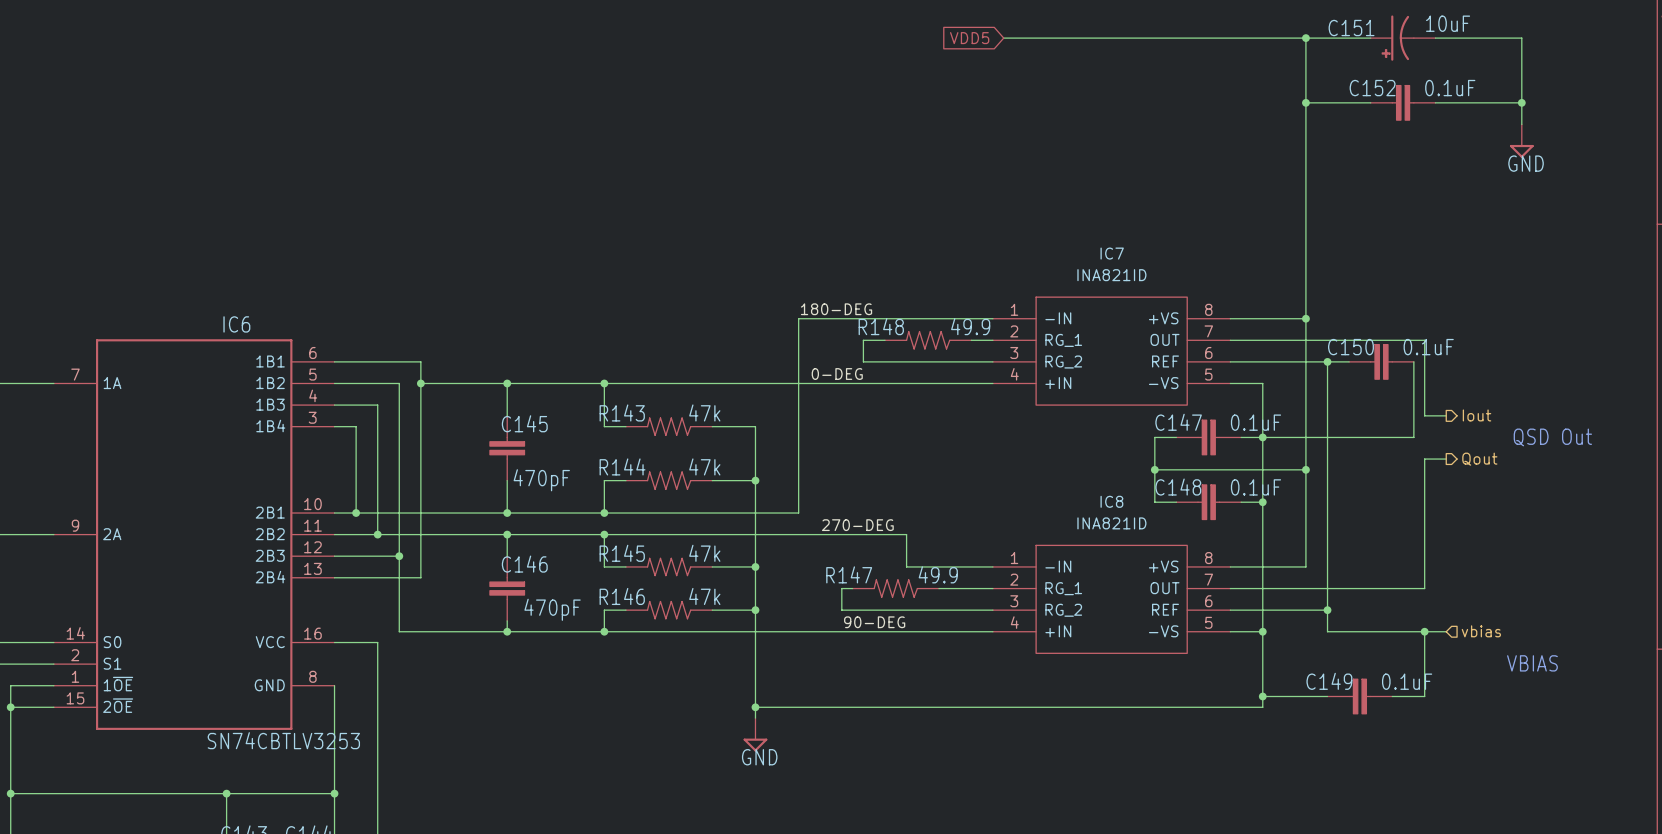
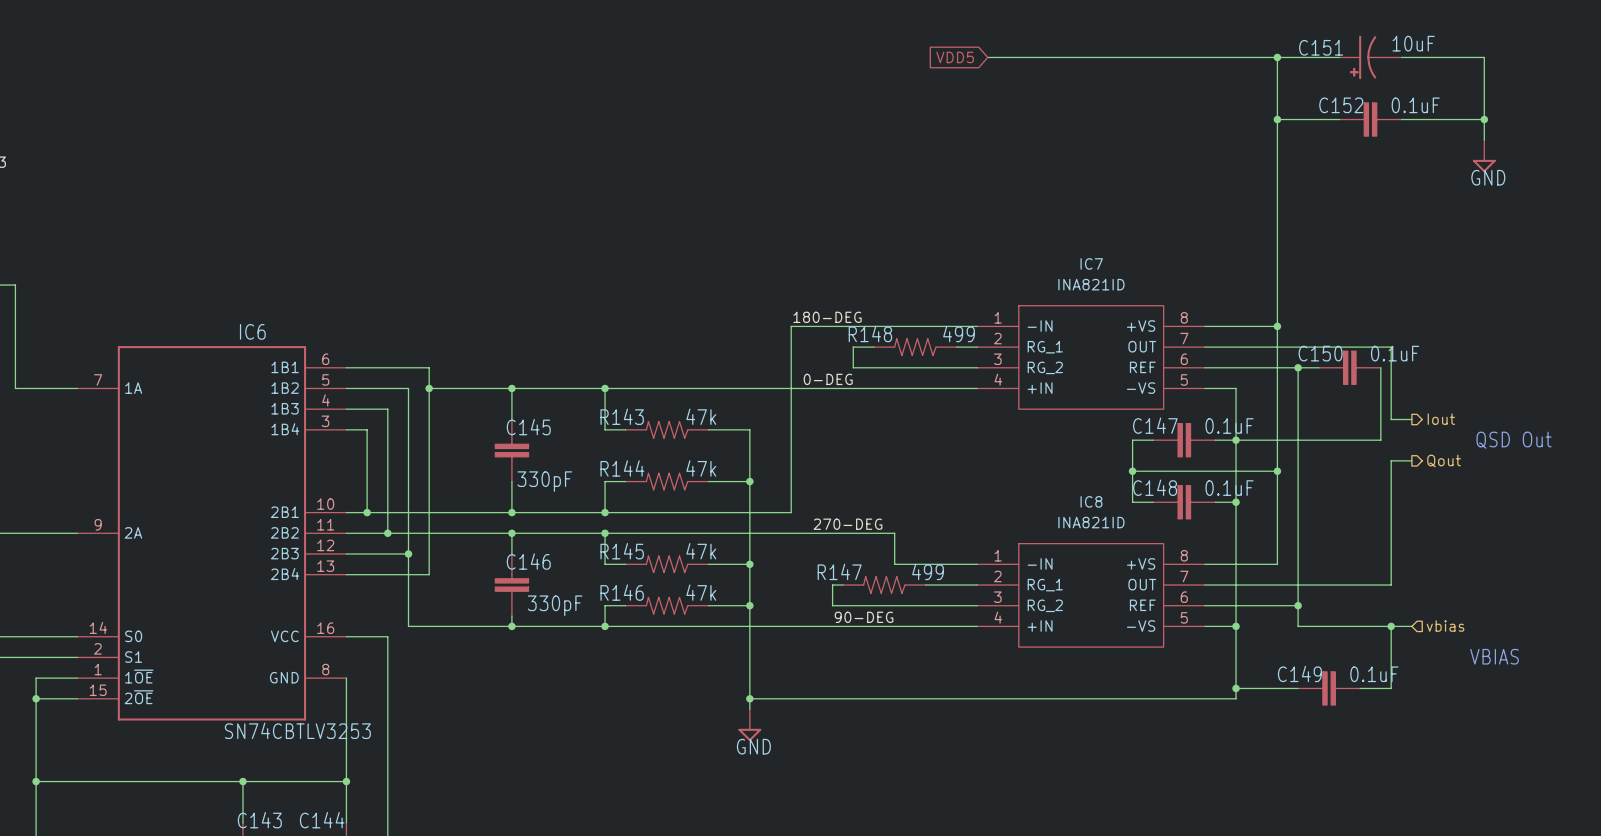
R148 value: 49.9 (970, 326) -> 499 (959, 333)
C145 value: 470pF (541, 480) -> 330pF (544, 481)
R147 value: 49.9 (938, 574) -> 499 (927, 571)
C146 value: 470pF (552, 609) -> 330pF (555, 605)

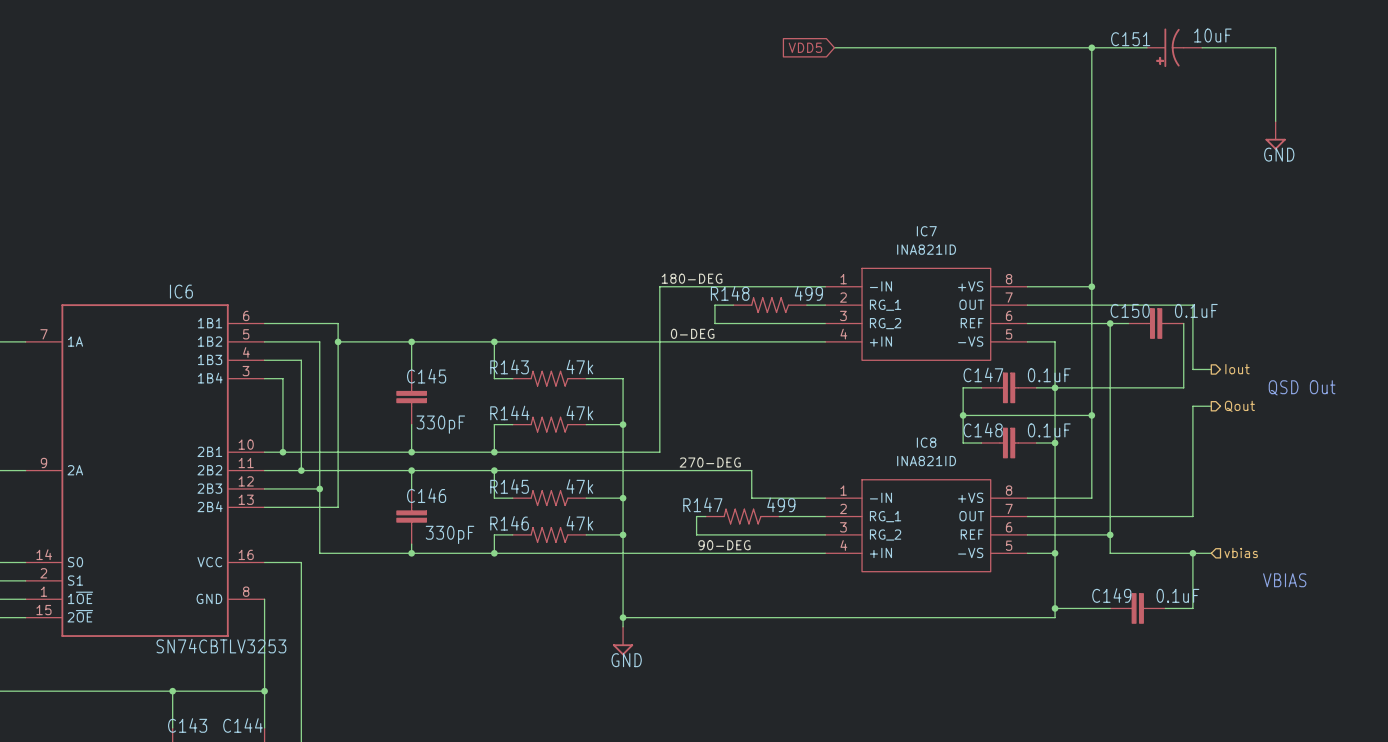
wire: (1277, 119) (1339, 119) -> none
junction: (1277, 119) -> none
C152: 0.1uF (1370, 119) -> none
wire: (1401, 119) (1484, 119) -> none
junction: (1484, 119) -> none

